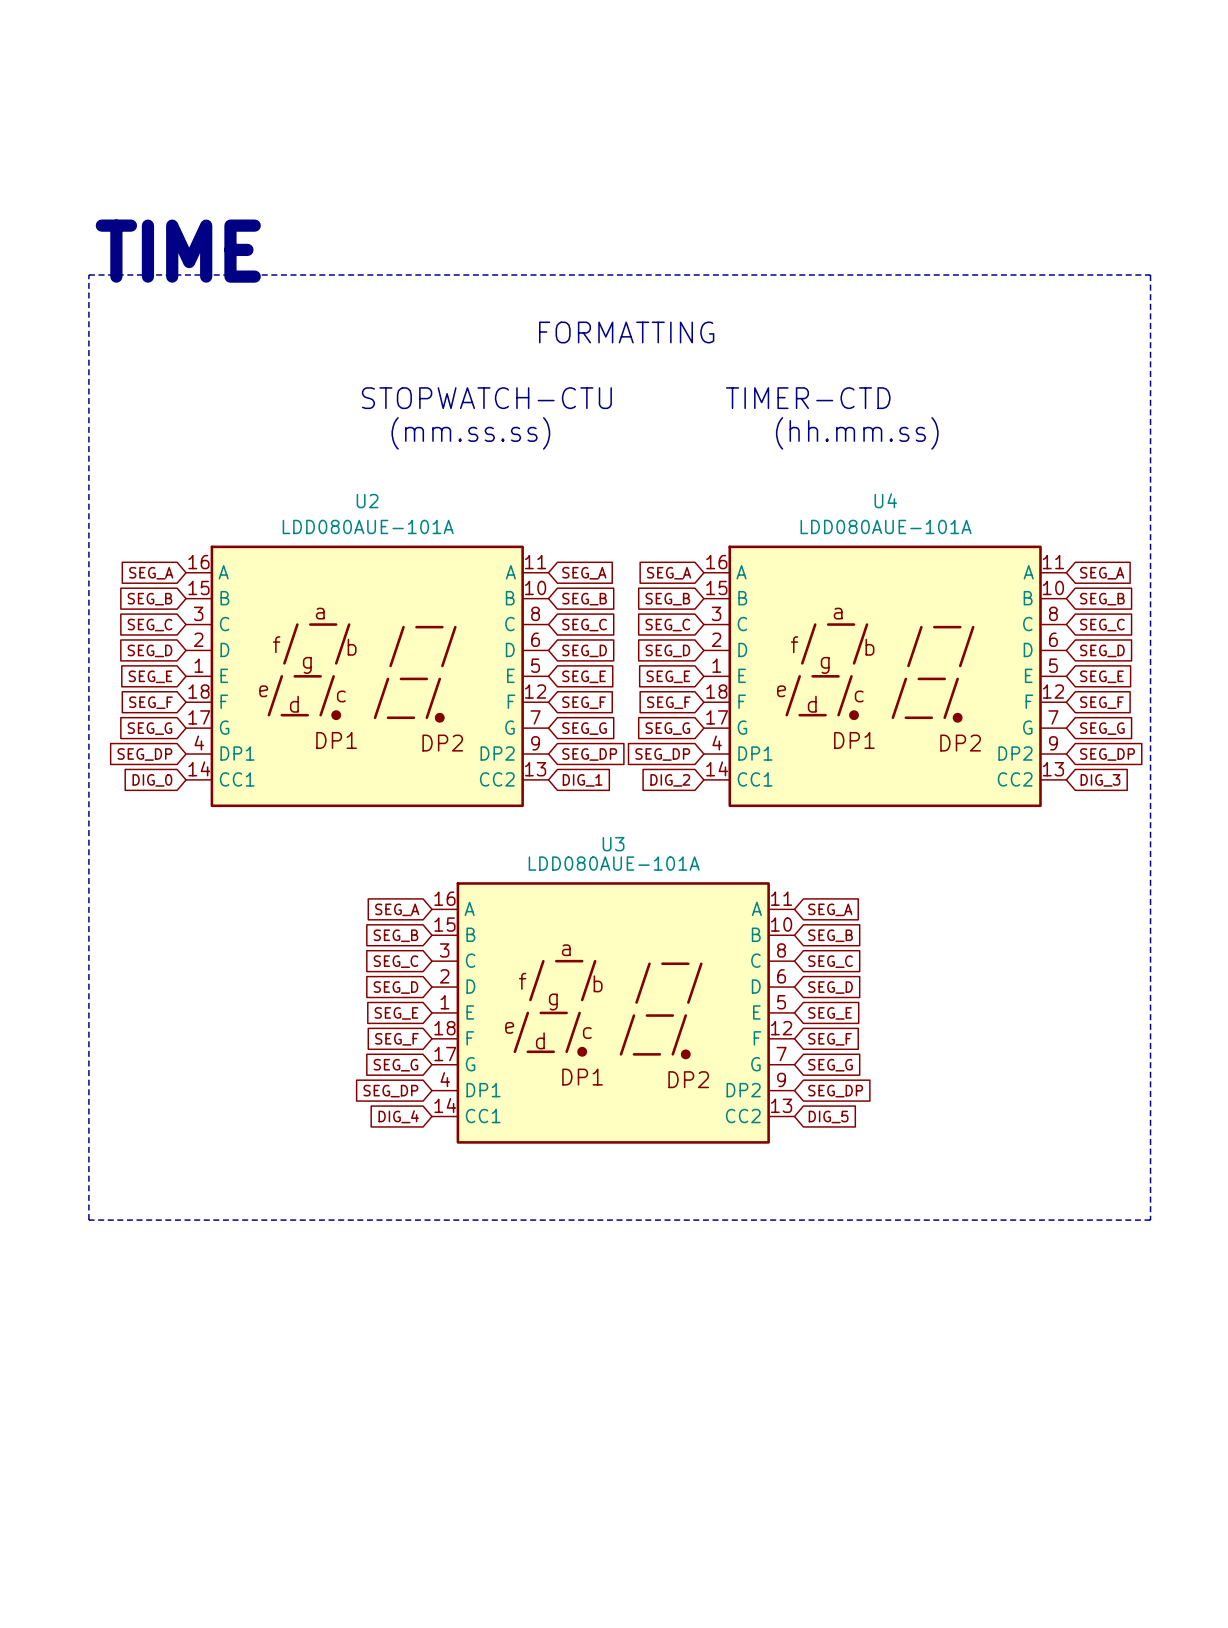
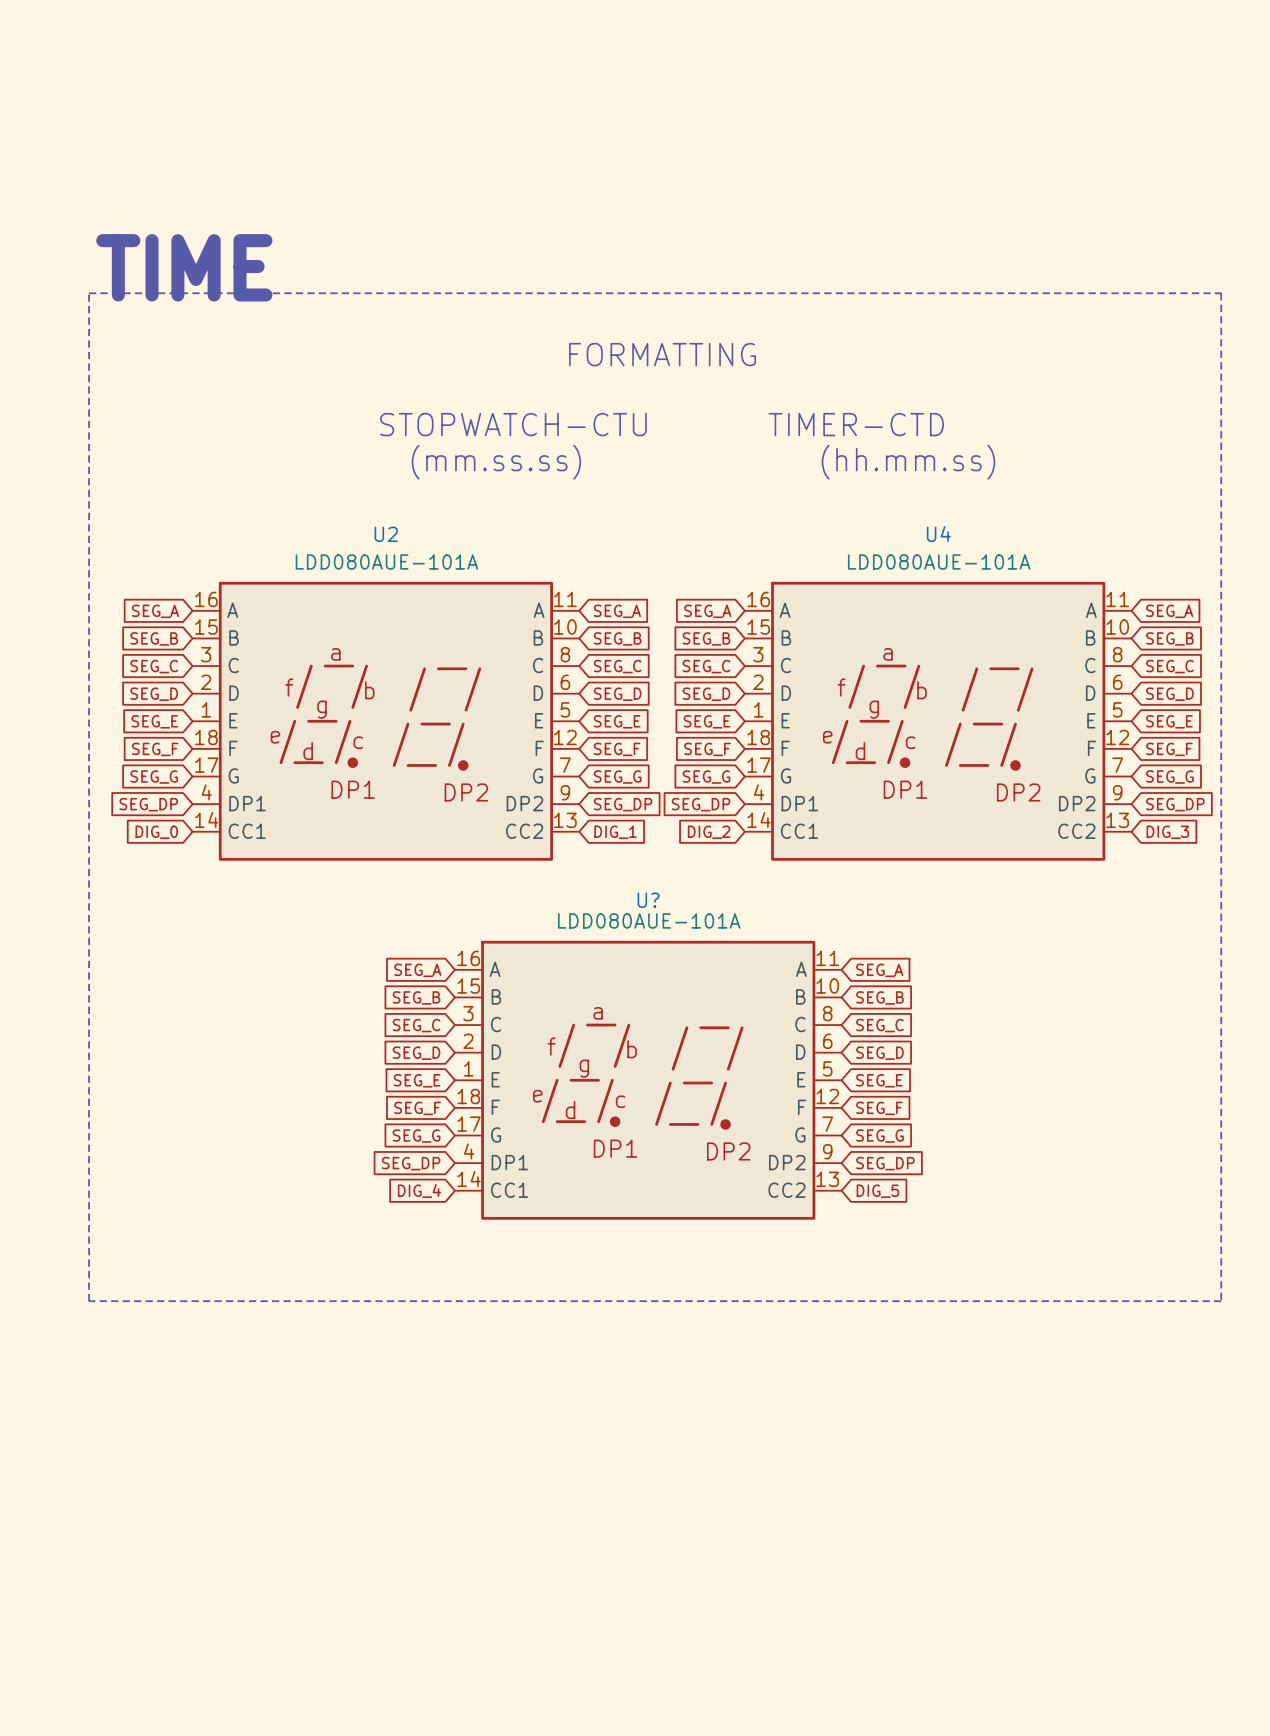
U3 name: U3 (613, 844) -> U? (648, 900)

